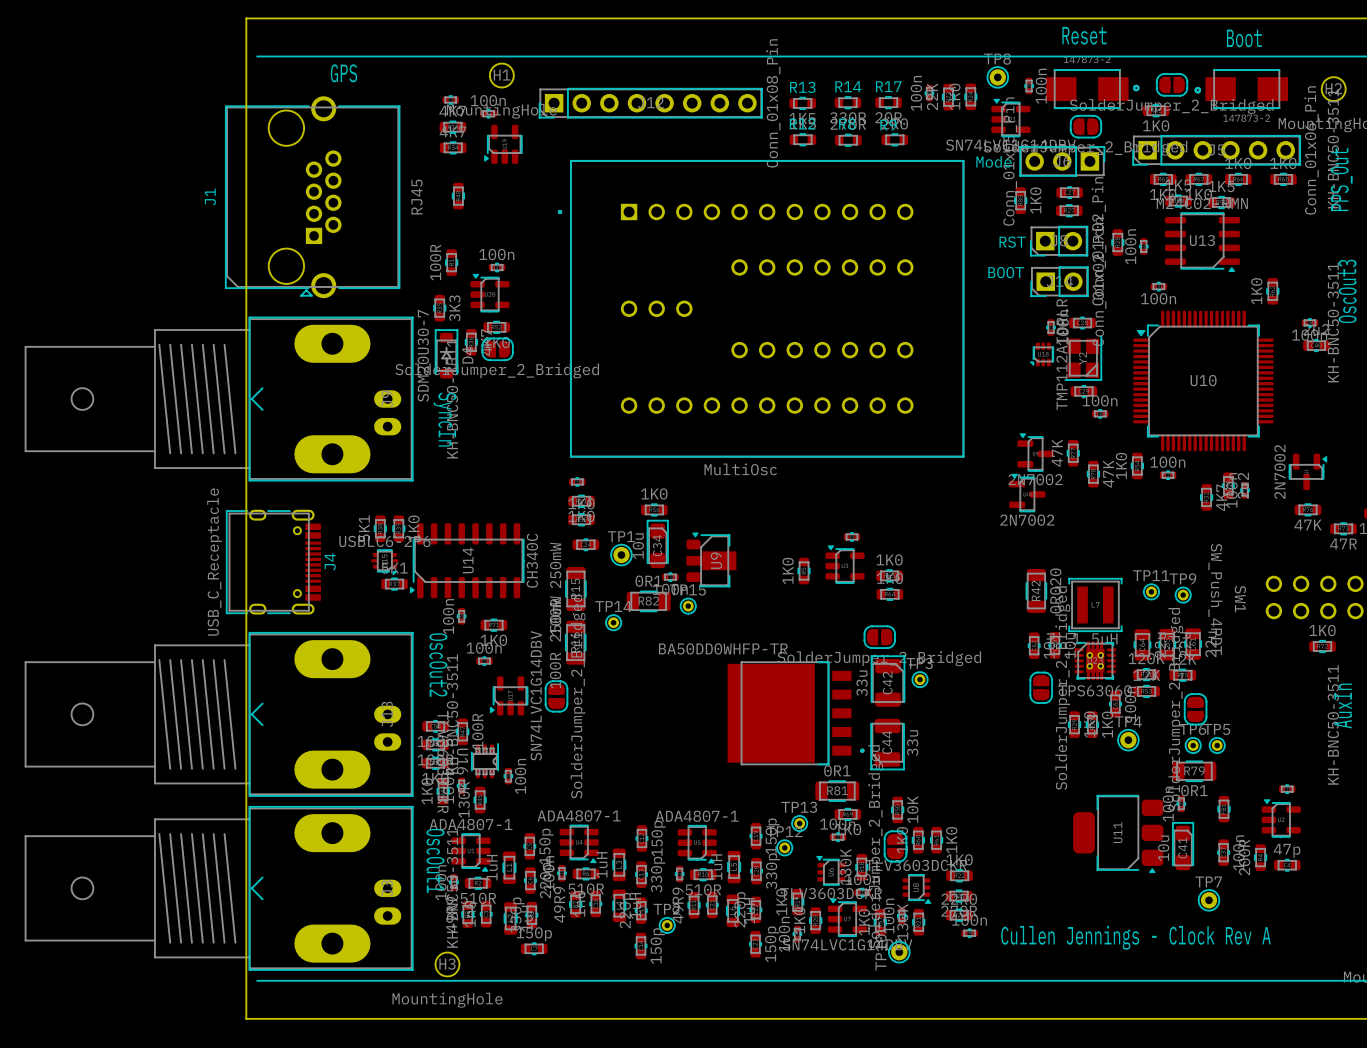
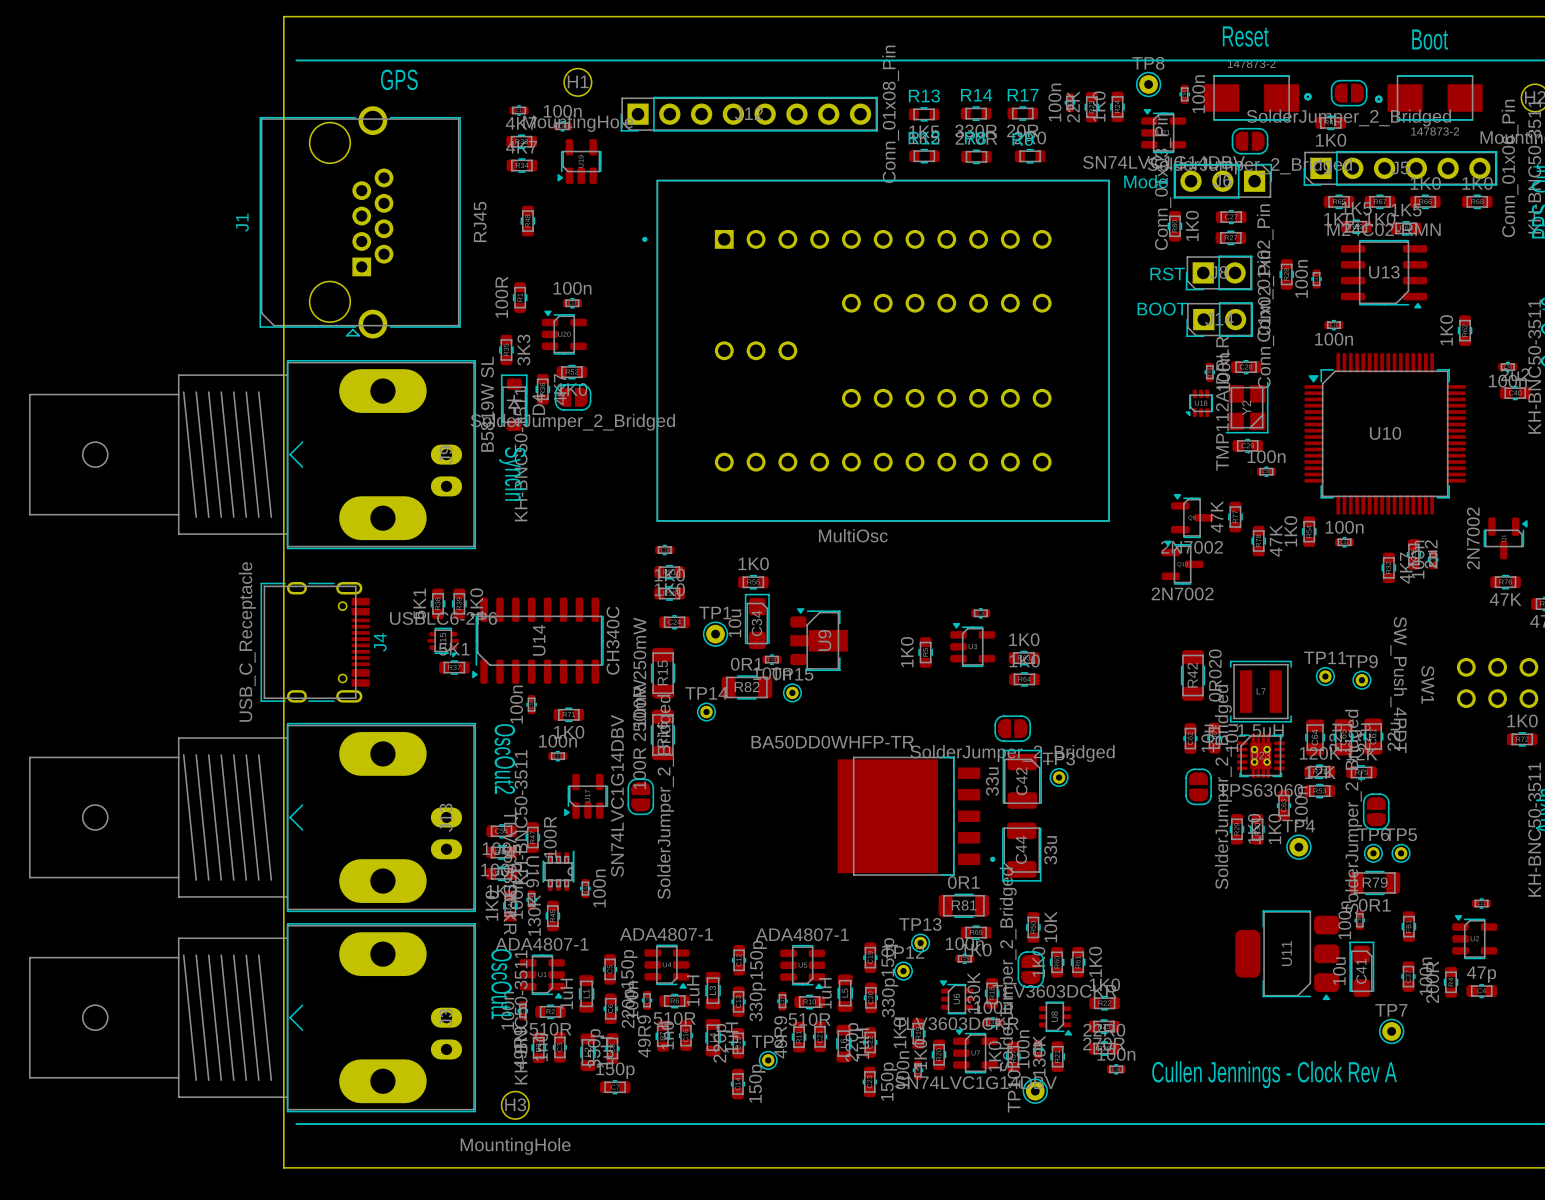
D4 value: SDM20U30-7 (423, 355) -> B5819W SL (487, 404)

